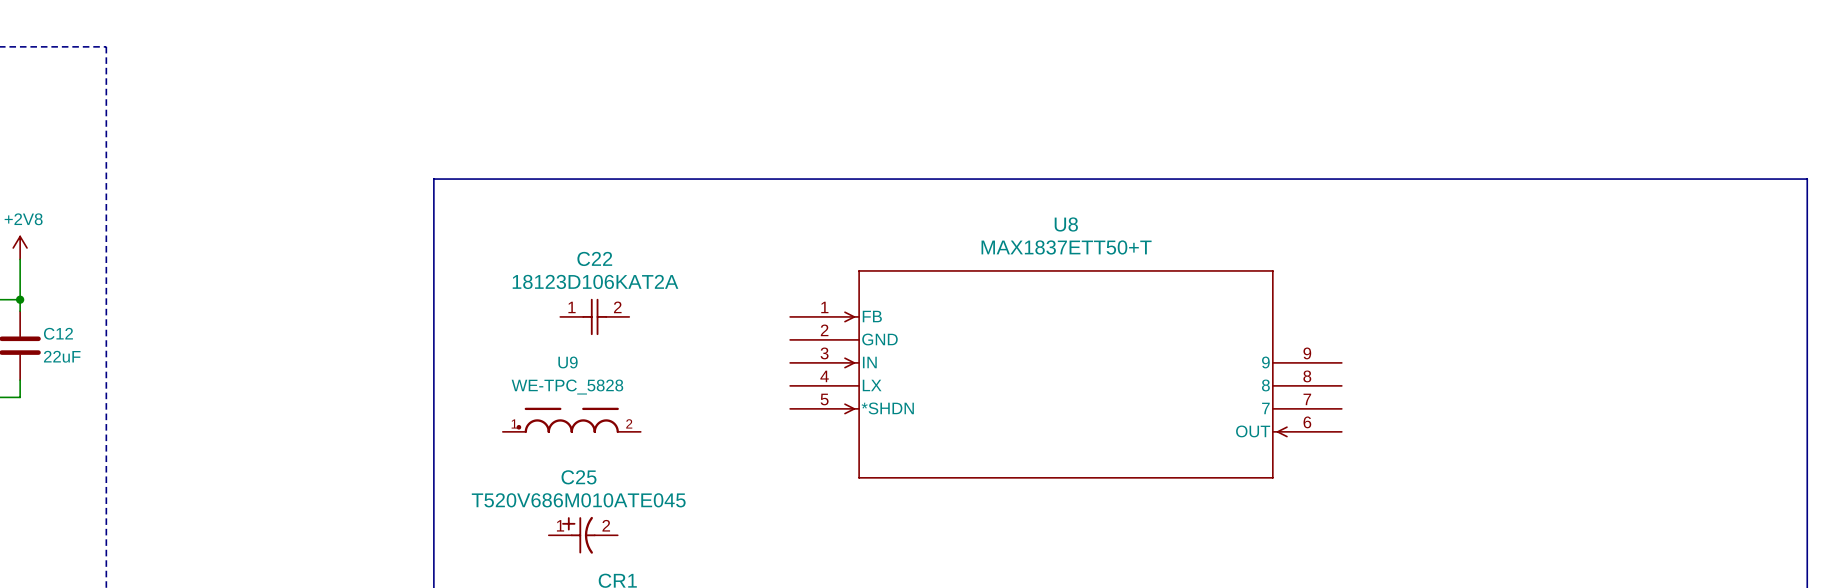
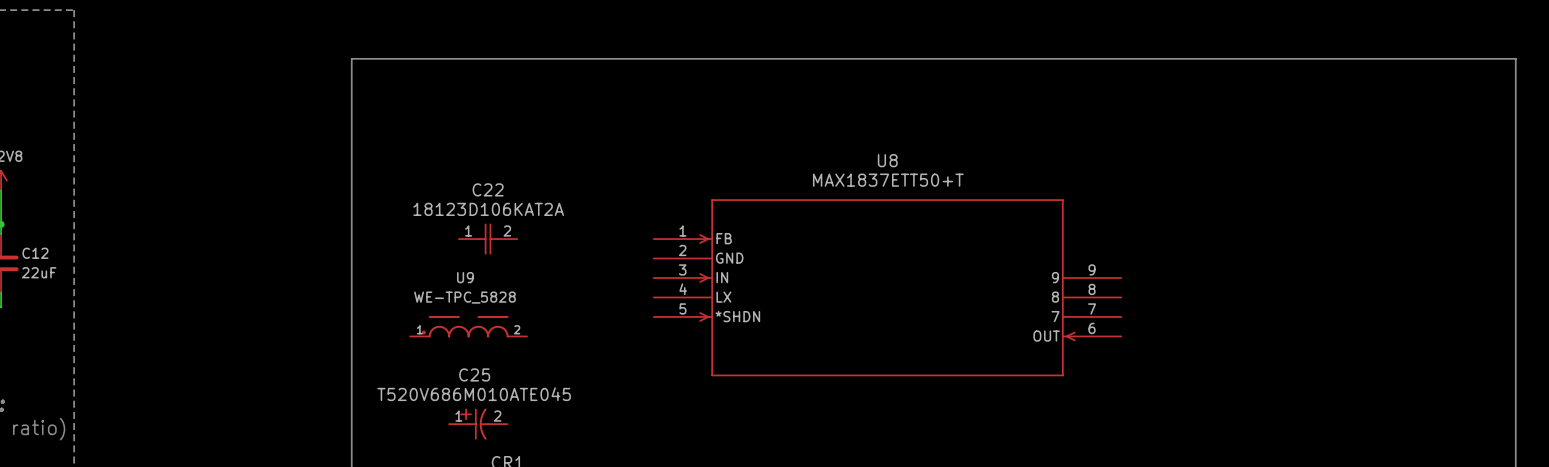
line: (433, 179) (1807, 179) -> (351, 122) (351, 58) (1515, 58) (1515, 122)

